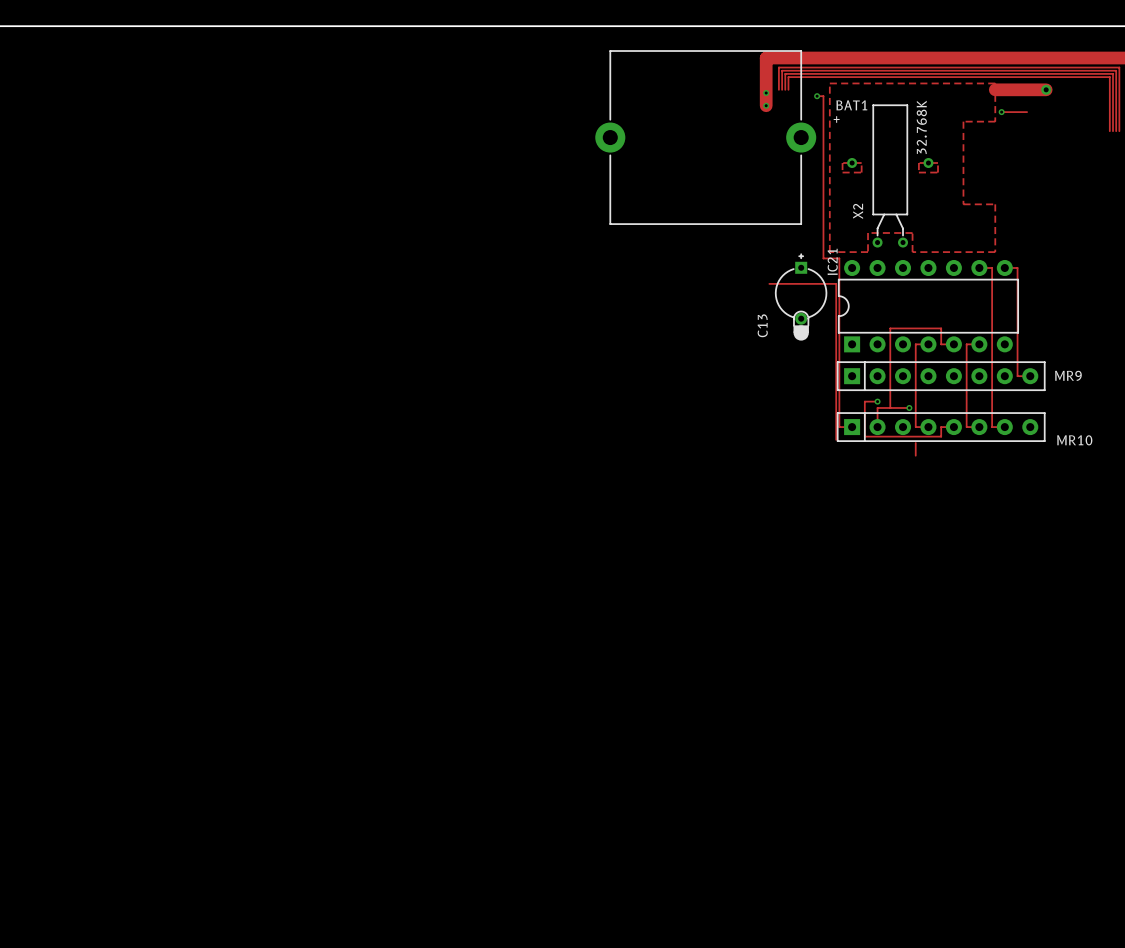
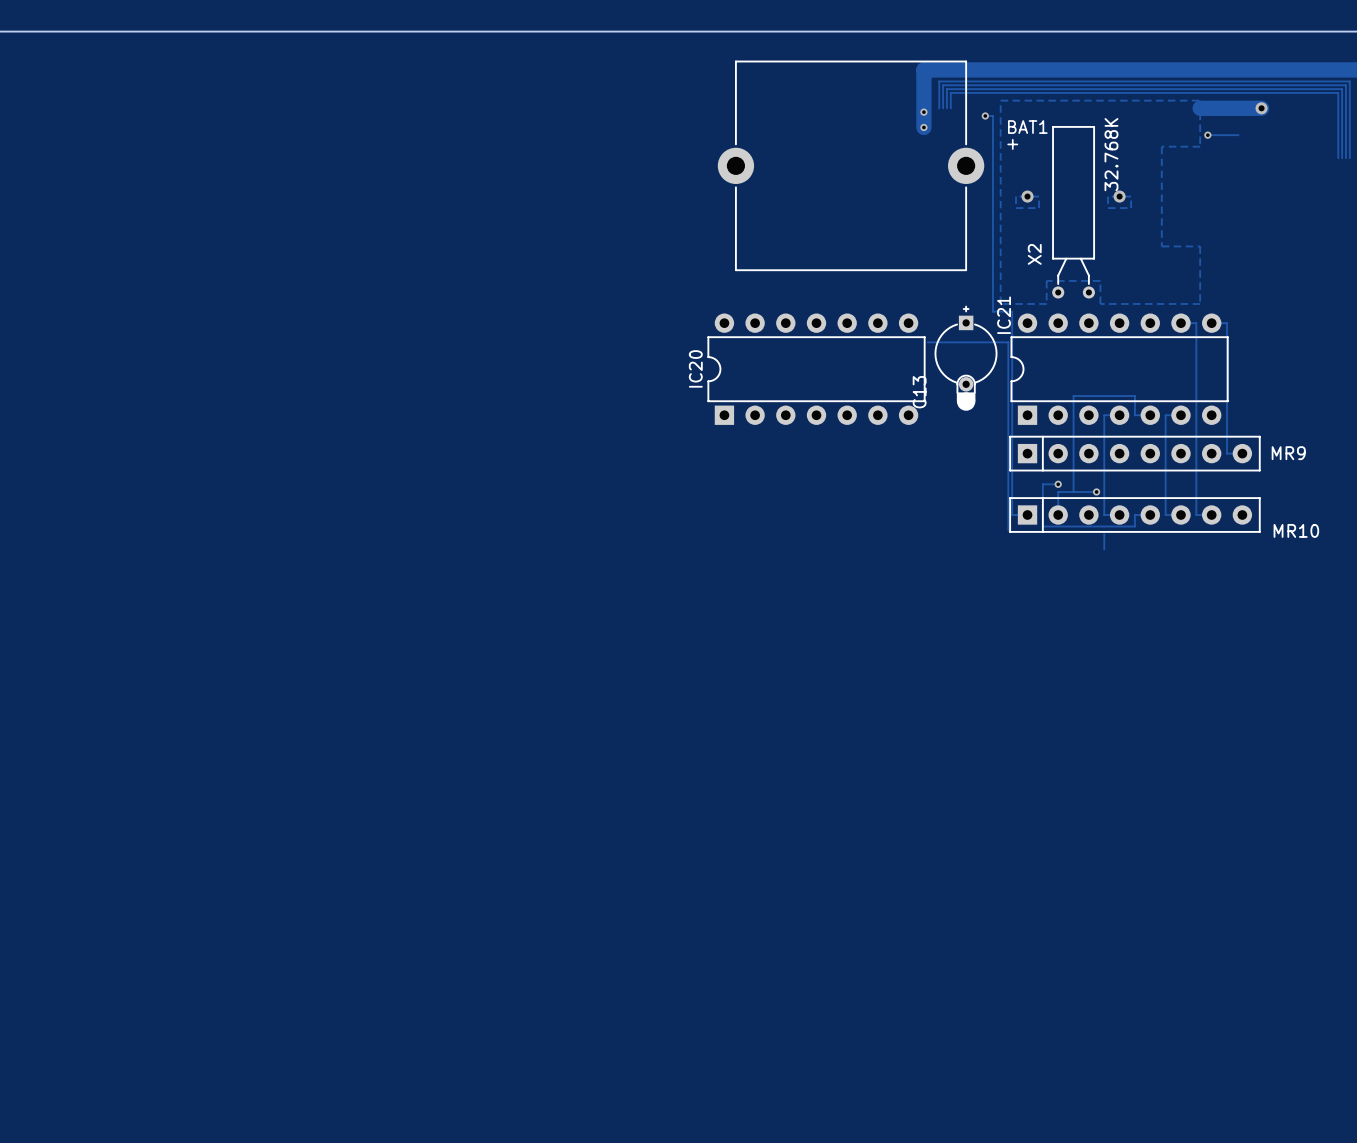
IC20: none -> (816, 369)

